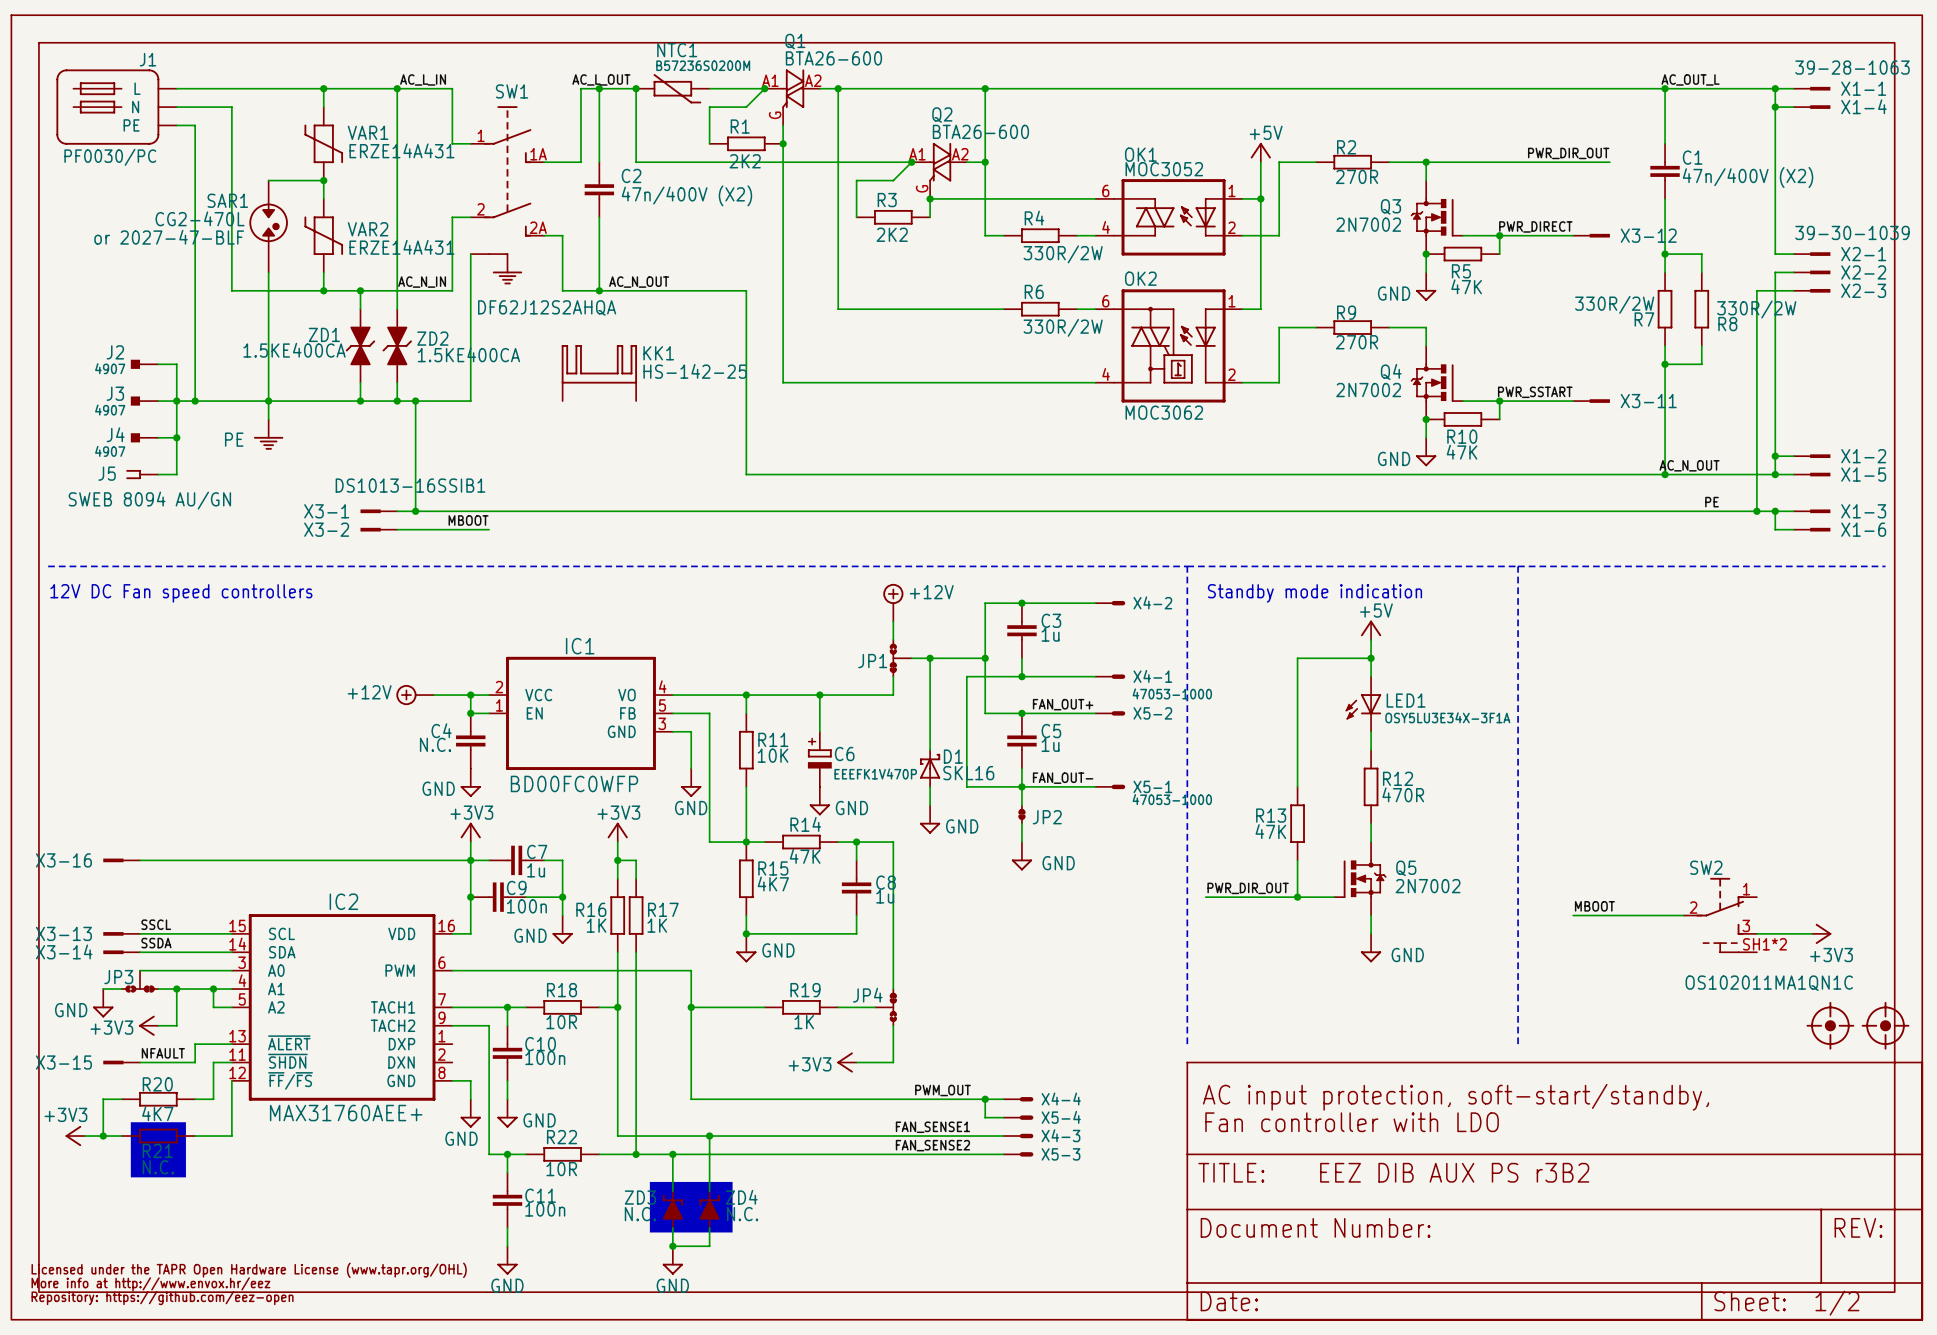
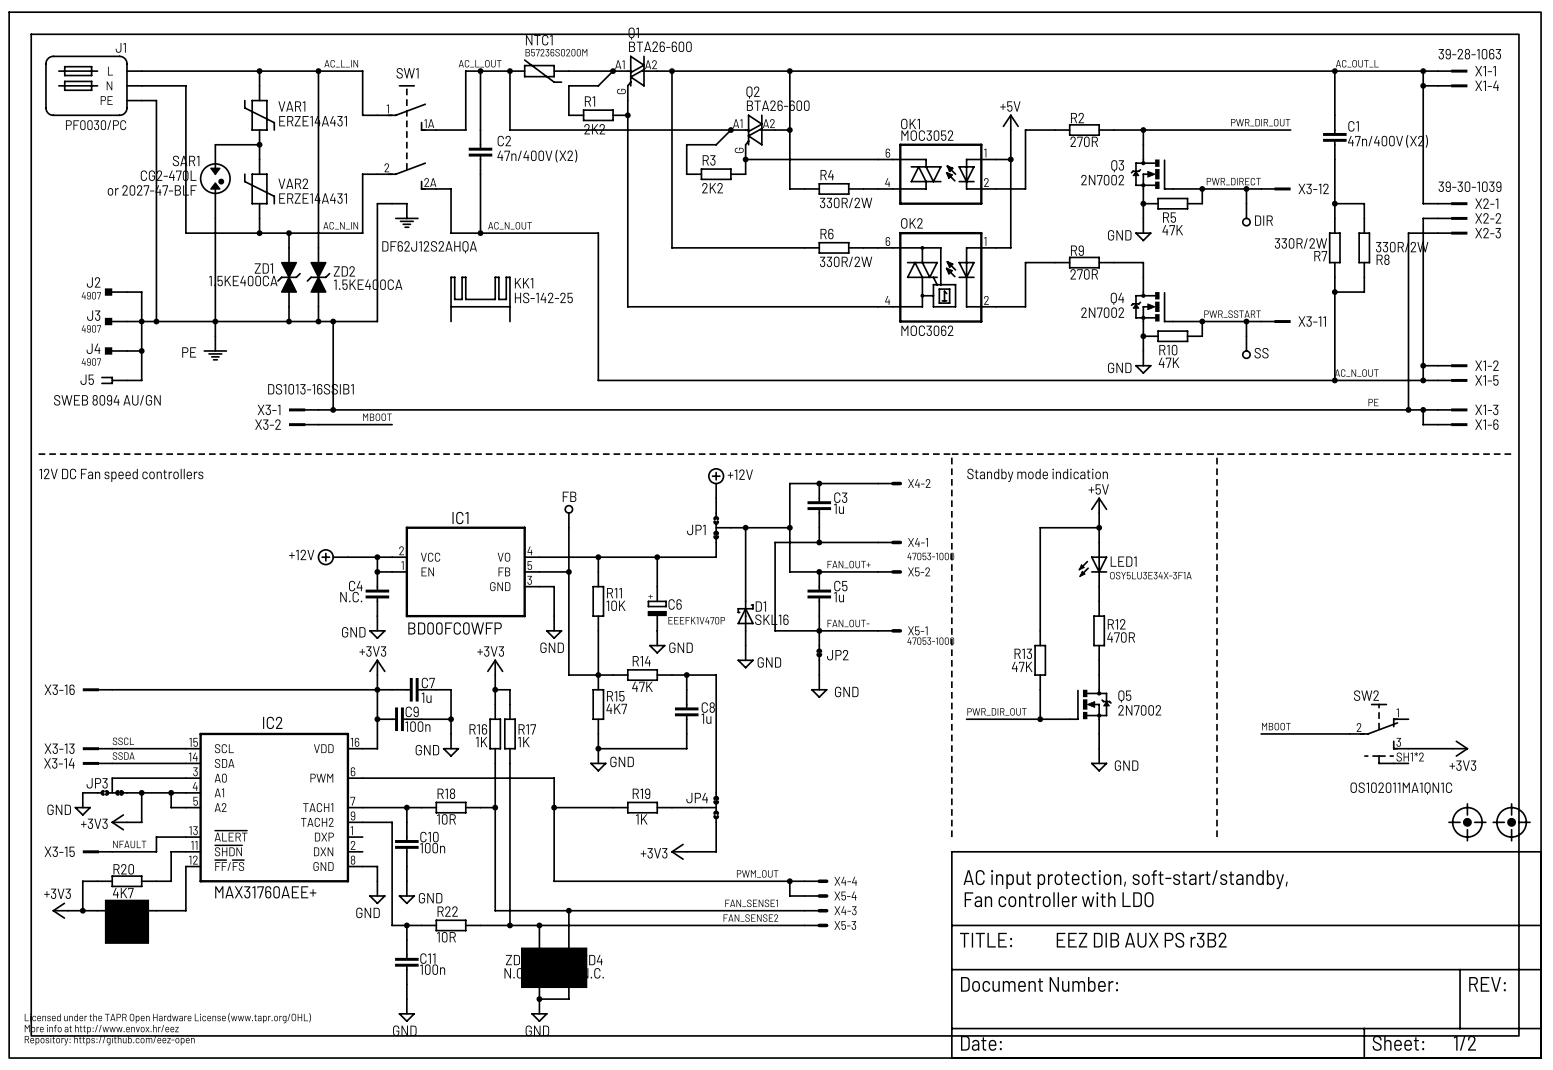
wire: none -> (1246, 188) (1246, 203)
junction: none -> (1246, 188)
DIR: none -> (1246, 214)
wire: none -> (1246, 321) (1246, 336)
junction: none -> (1246, 321)
SS: none -> (1246, 347)
FB: none -> (568, 516)
wire: none -> (568, 527) (568, 571)
junction: none -> (568, 571)

